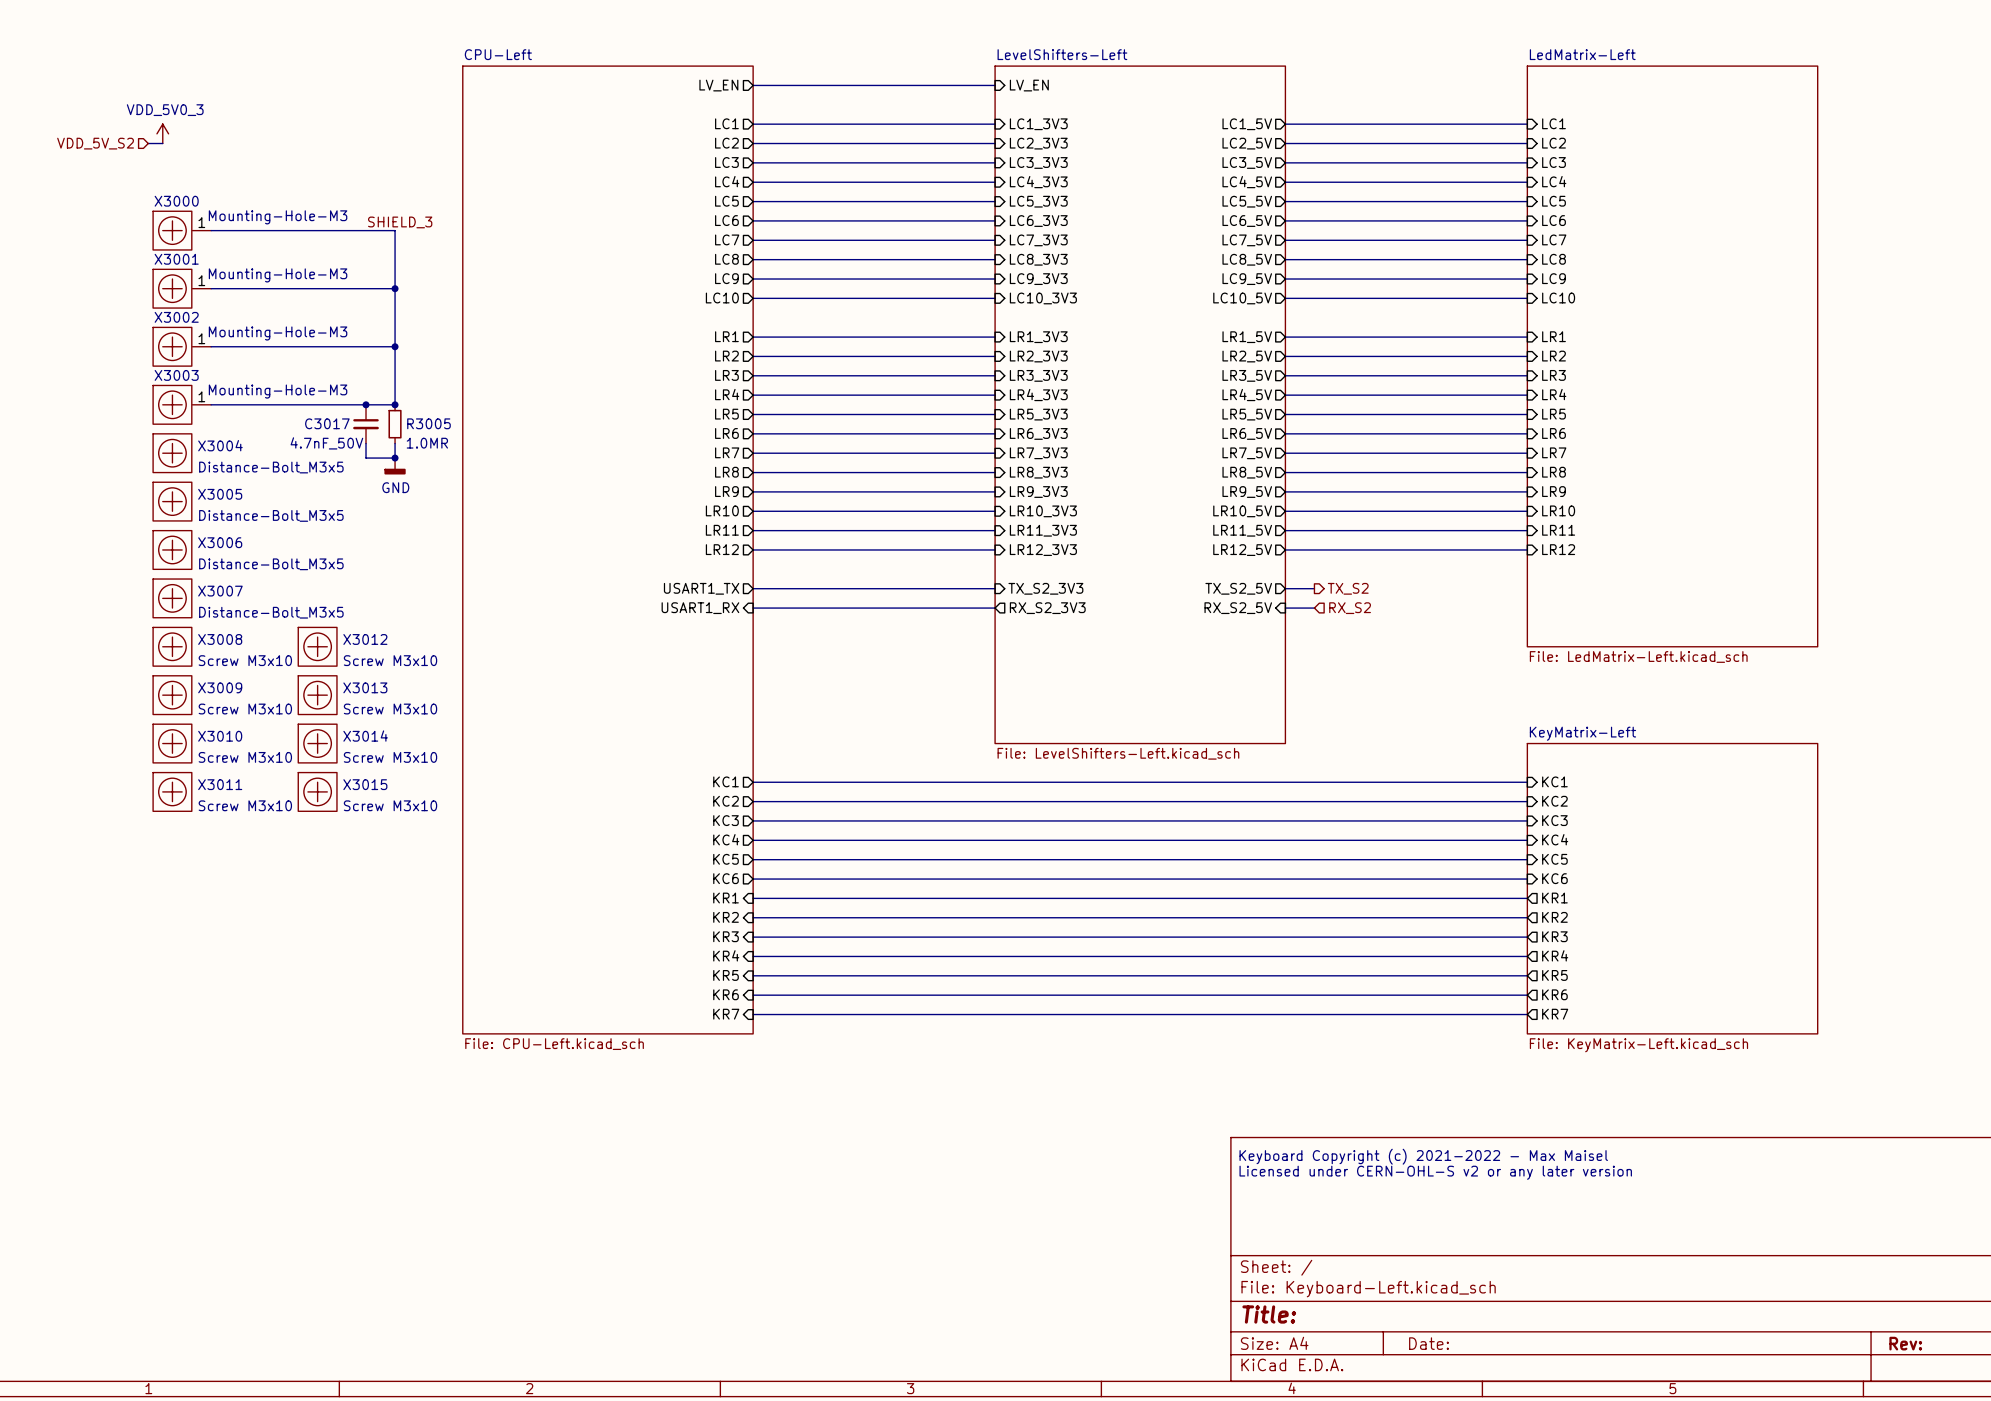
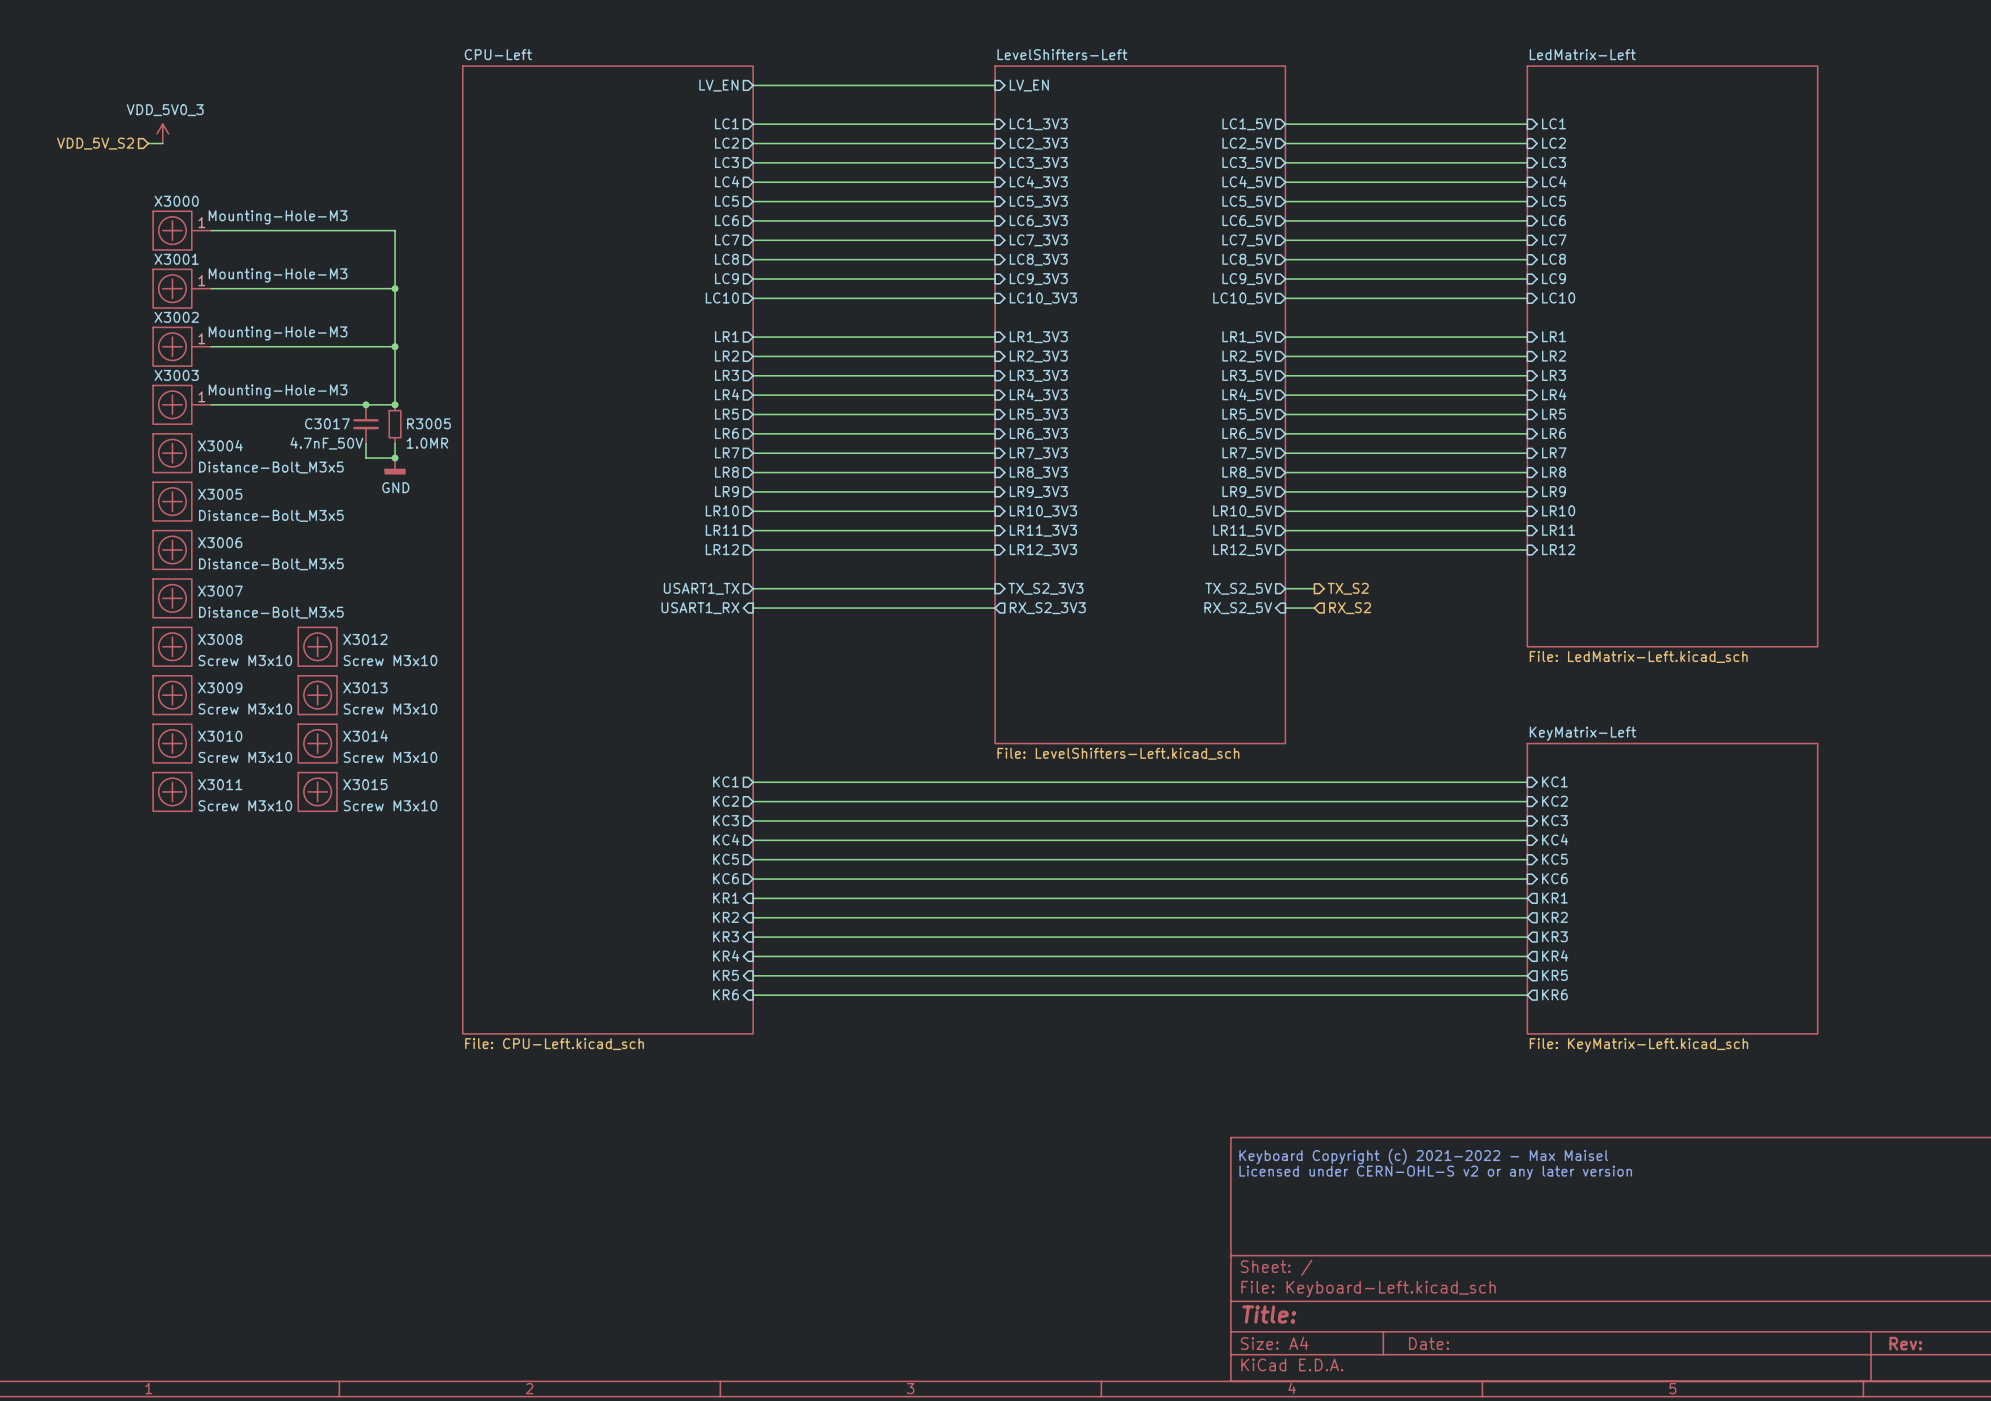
label: SHIELD_3 (400, 222) -> none
sheet pin: KR7 (726, 1014) -> none
wire: (753, 1014) (1527, 1014) -> none
sheet pin: KR7 (1555, 1014) -> none

